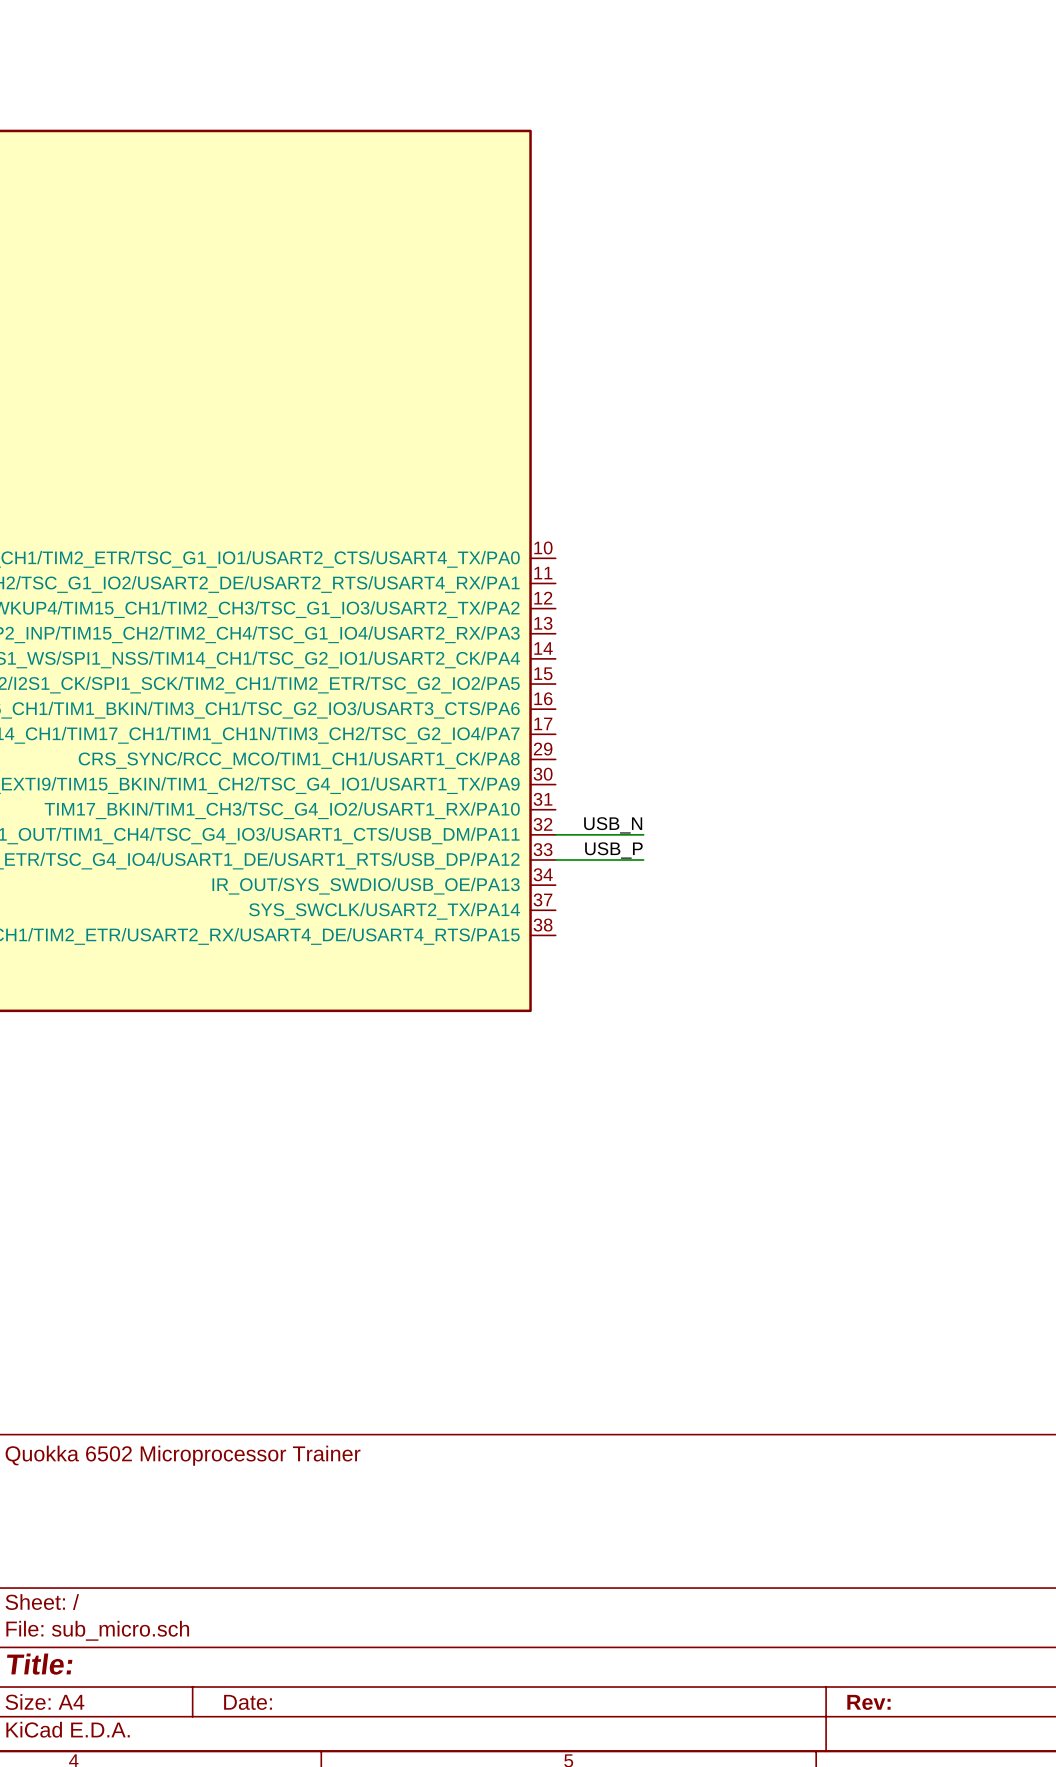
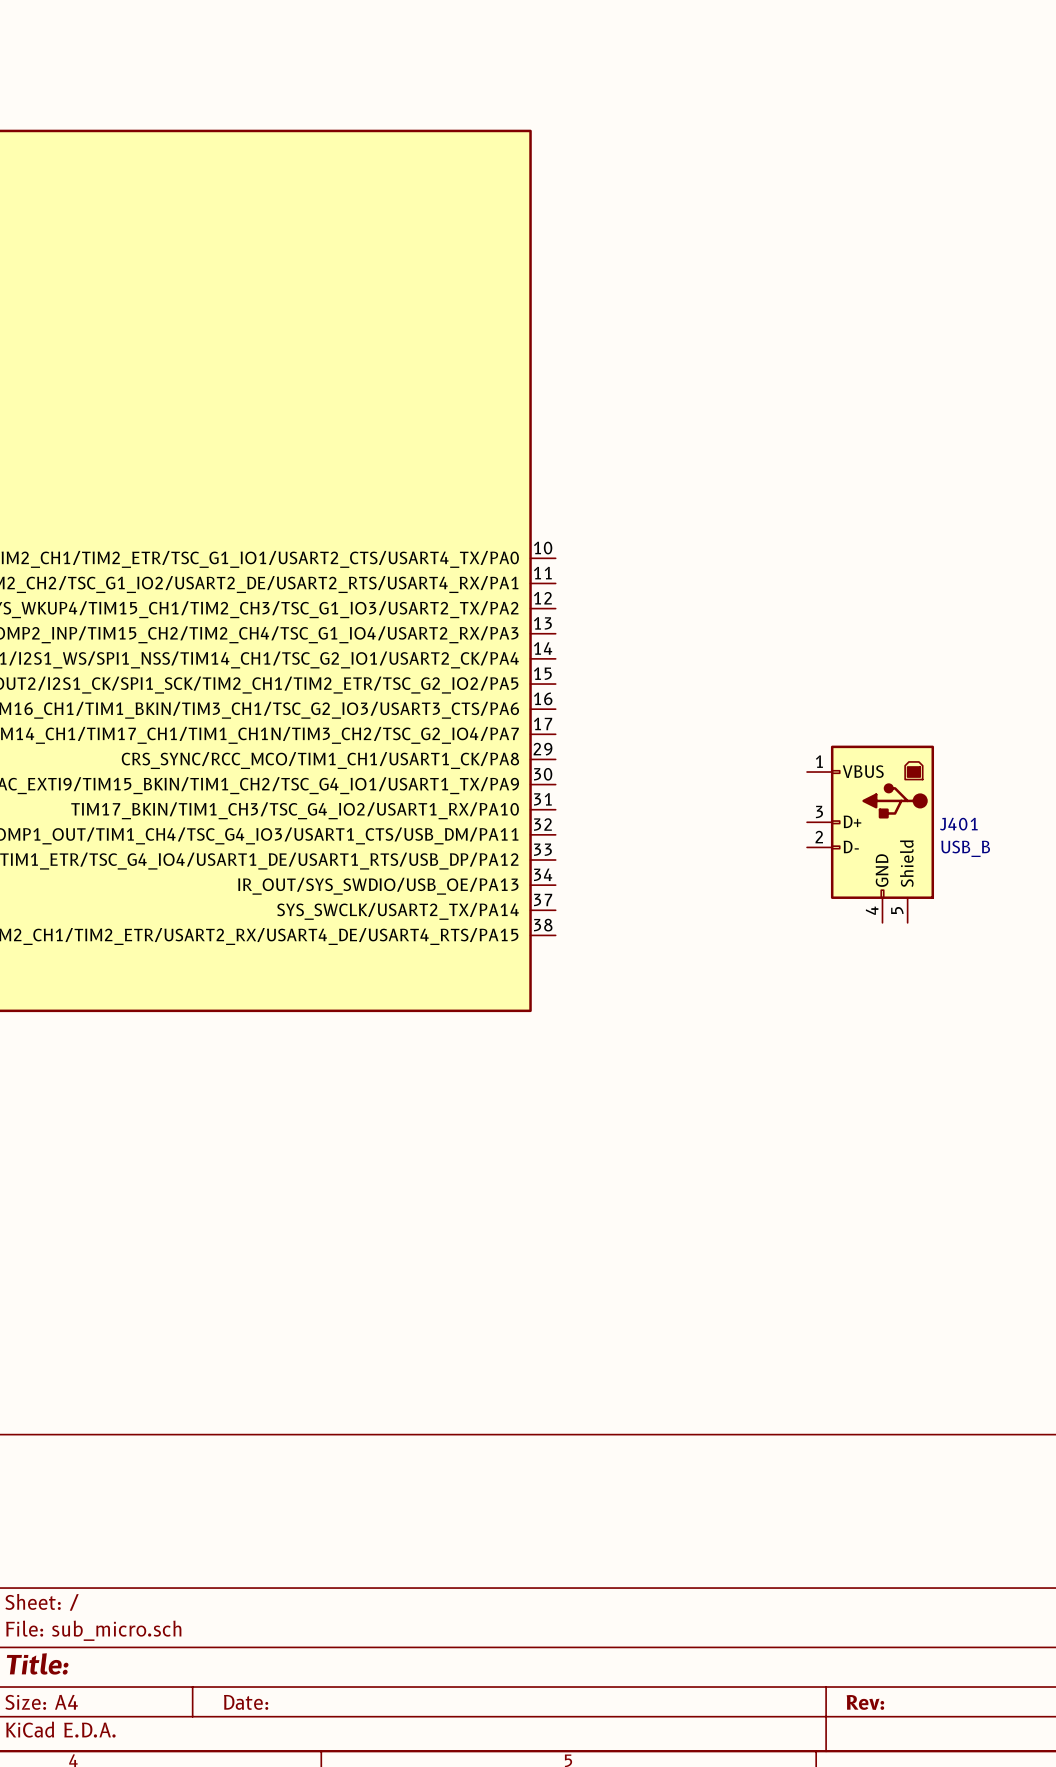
label: USB_N (613, 825) -> none
wire: (555, 834) (643, 834) -> none
J401: none -> USB_B (870, 834)
label: USB_P (613, 850) -> none
wire: (555, 860) (643, 860) -> none
title block: Quokka 6502 Microprocessor Trainer (183, 1455) -> none

